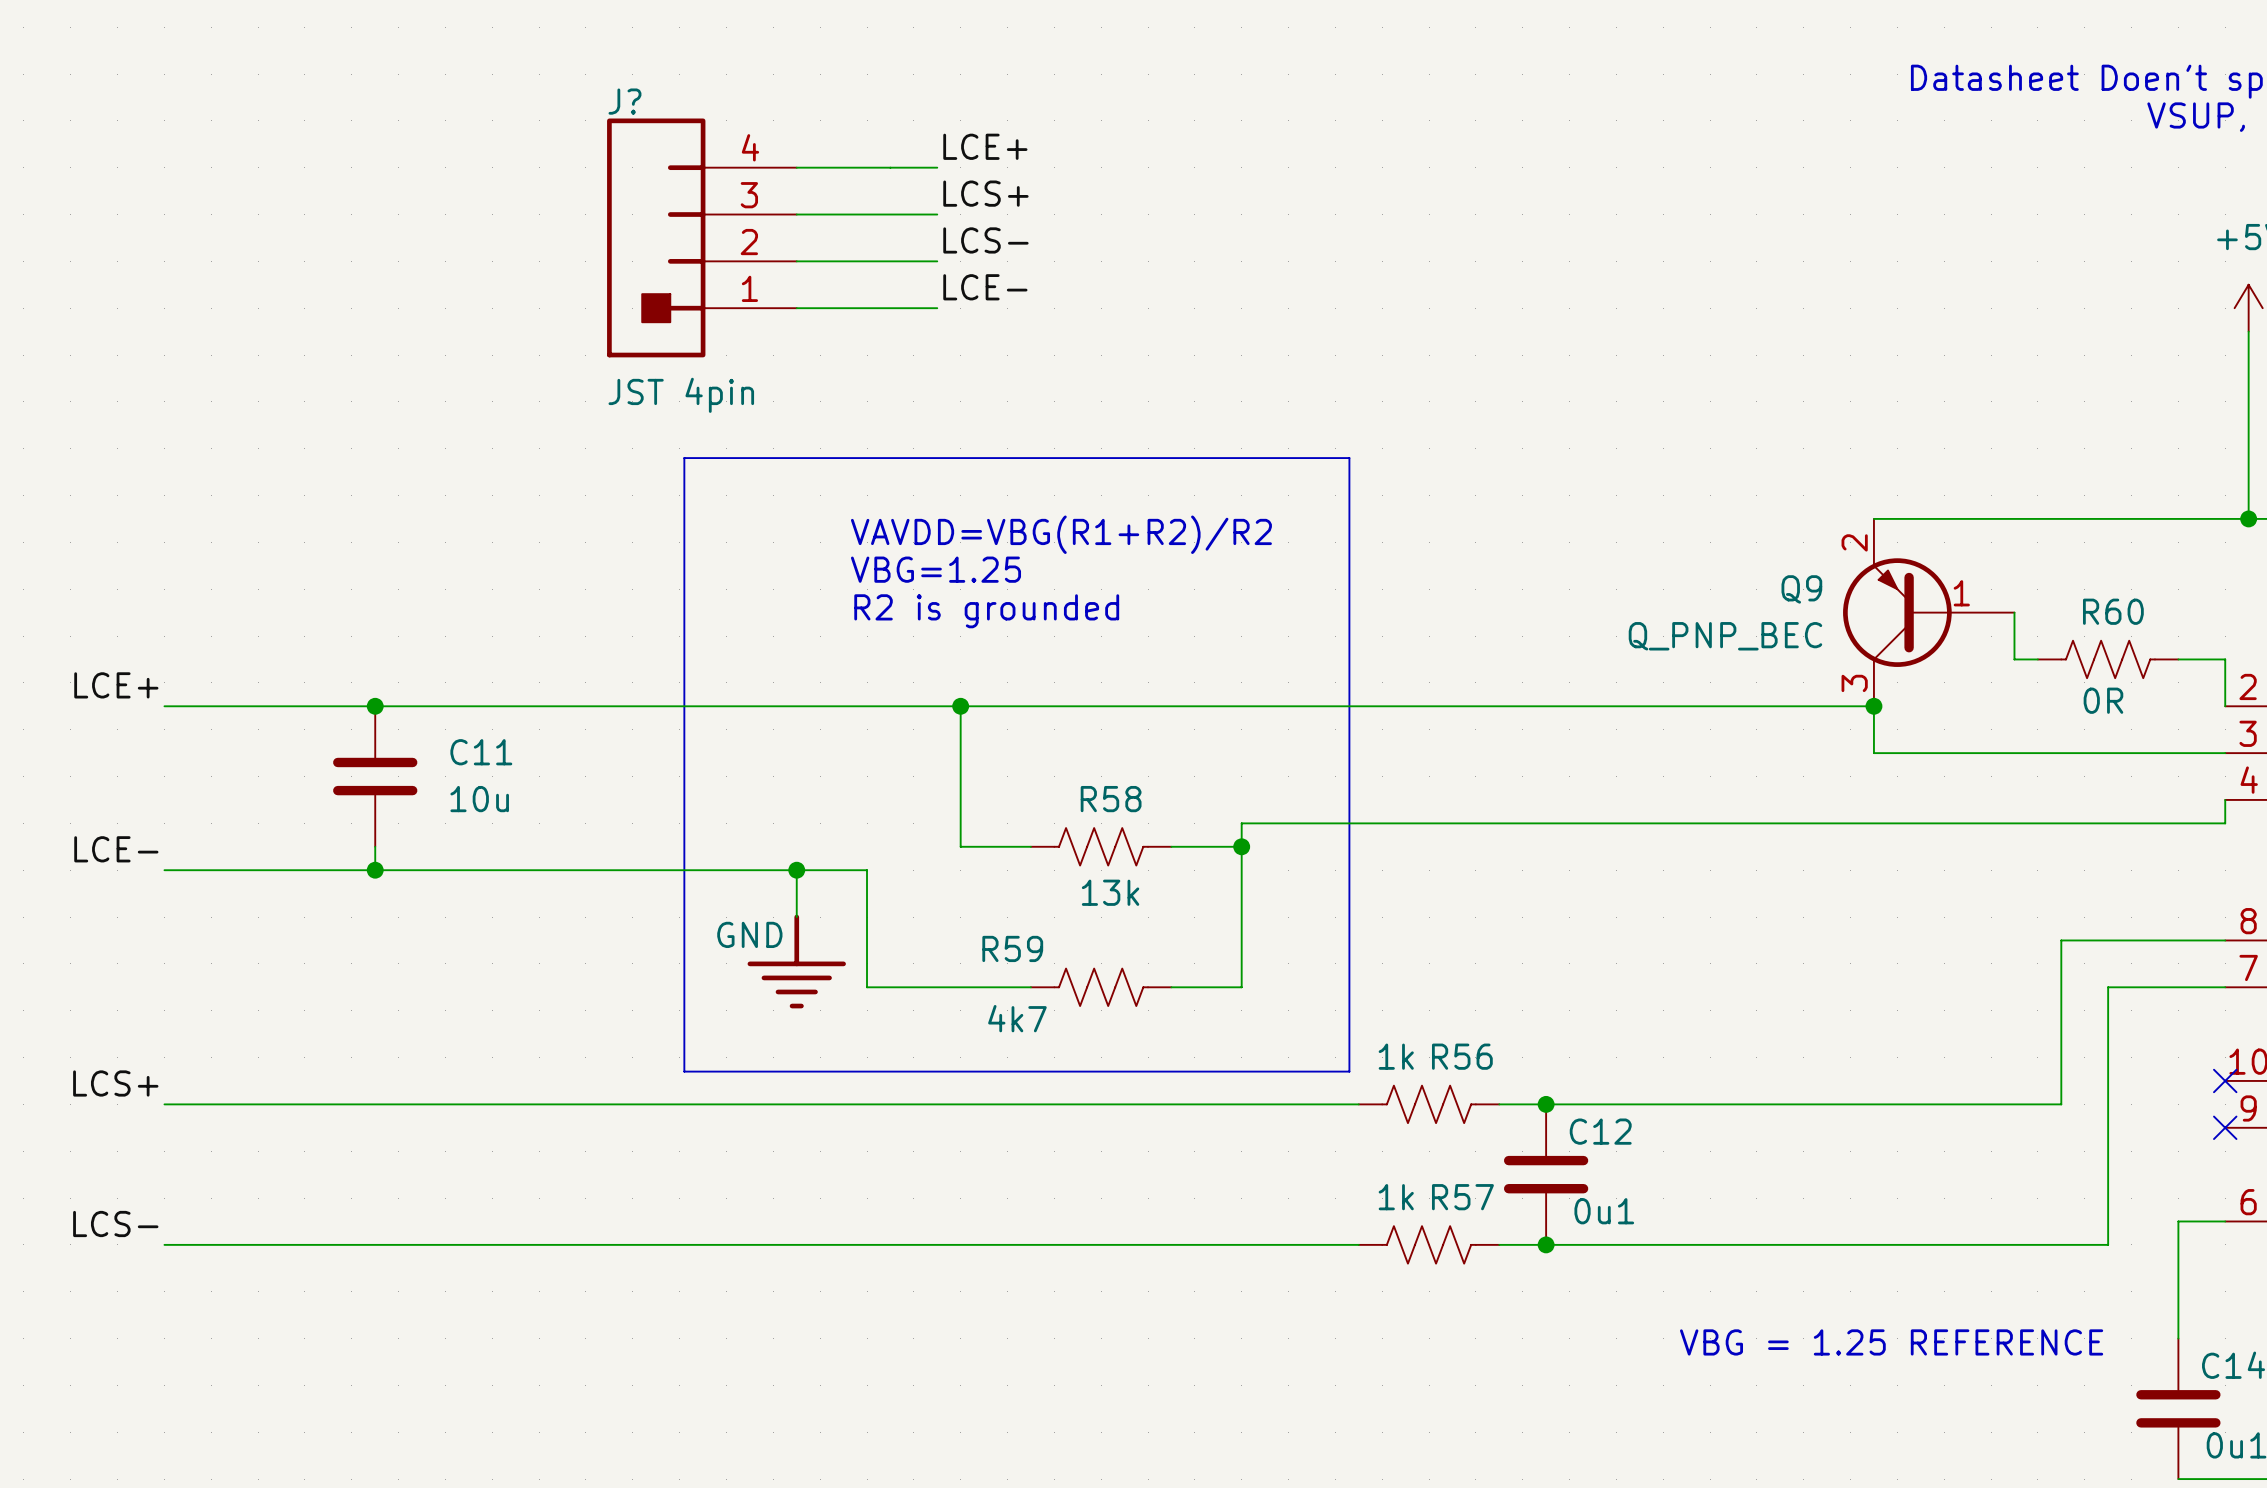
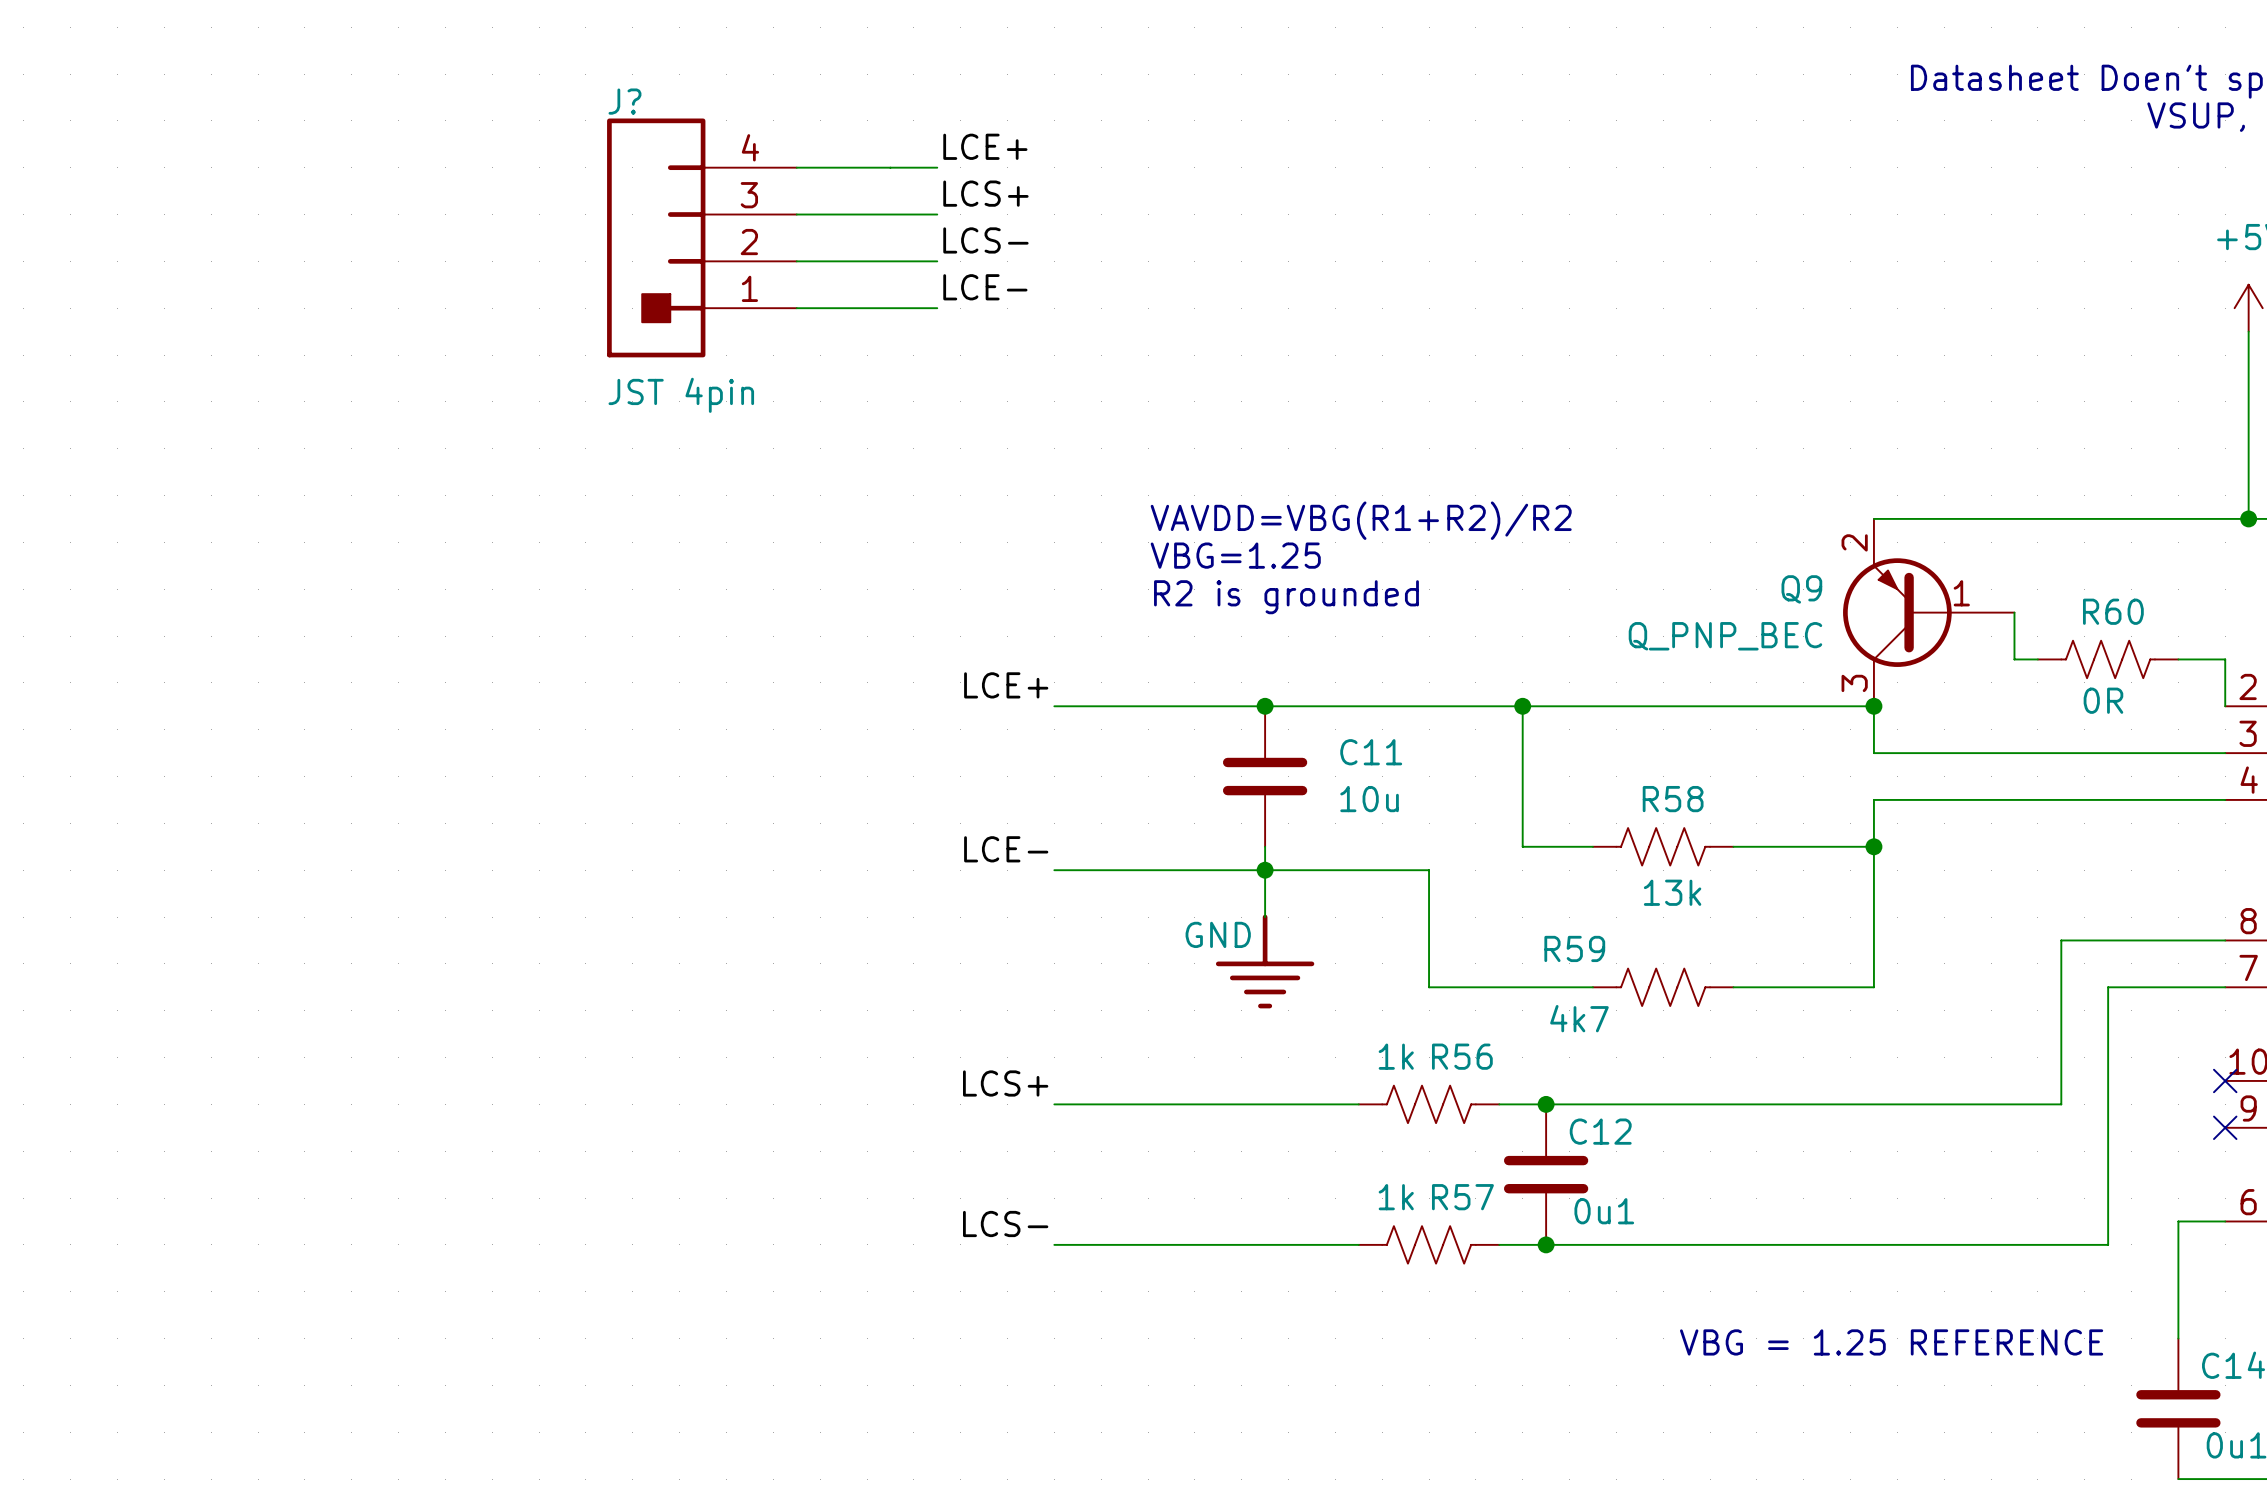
line: (684, 458) (1349, 458) (1349, 1071) (684, 1071) (684, 458) -> none
text position: VAVDD=VBG(R1+R2)/R2 (1061, 534) -> VAVDD=VBG(R1+R2)/R2 (1361, 520)
text position: VBG=1.25 (935, 569) -> VBG=1.25 (1235, 555)
text position: R2 is grounded (986, 611) -> R2 is grounded (1286, 597)
label: LCE+ (116, 685) -> none
label: none -> LCE+ (1006, 685)
wire: (164, 706) (1054, 706) -> none
junction: (375, 706) -> none
wire: (960, 706) (960, 846) (1030, 846) -> none
junction: (960, 706) -> none
junction: none -> (1265, 706)
wire: none -> (1522, 706) (1522, 846) (1592, 846)
junction: none -> (1522, 706)
C11 position: (375, 776) -> (1265, 776)
wire: (2225, 799) (2225, 823) (1241, 823) (1241, 987) (1171, 987) -> (2225, 799) (1873, 799) (1873, 987) (1733, 987)
wire: (375, 846) (375, 870) -> none
R58 position: (1101, 846) -> (1663, 846)
wire: (1171, 846) (1241, 846) -> none
junction position: (1241, 846) -> (1265, 870)
wire: none -> (1265, 846) (1265, 917)
wire: none -> (1733, 846) (1873, 846)
junction: none -> (1873, 846)
label: LCE- (116, 849) -> none
label: none -> LCE- (1006, 849)
wire: (164, 870) (867, 870) (867, 987) (1030, 987) -> none
junction: (375, 870) -> none
wire: (796, 870) (796, 917) -> none
junction: (796, 870) -> none
wire: none -> (1054, 870) (1429, 870) (1429, 987) (1592, 987)
power symbol: GND (796, 961) -> none
power symbol: none -> GND (1265, 961)
R59 position: (1101, 987) -> (1663, 987)
label: LCS+ (115, 1083) -> none
label: none -> LCS+ (1005, 1083)
wire: (164, 1104) (1054, 1104) -> none
label: LCS- (115, 1223) -> none
label: none -> LCS- (1005, 1223)
wire: (164, 1244) (1054, 1244) -> none

